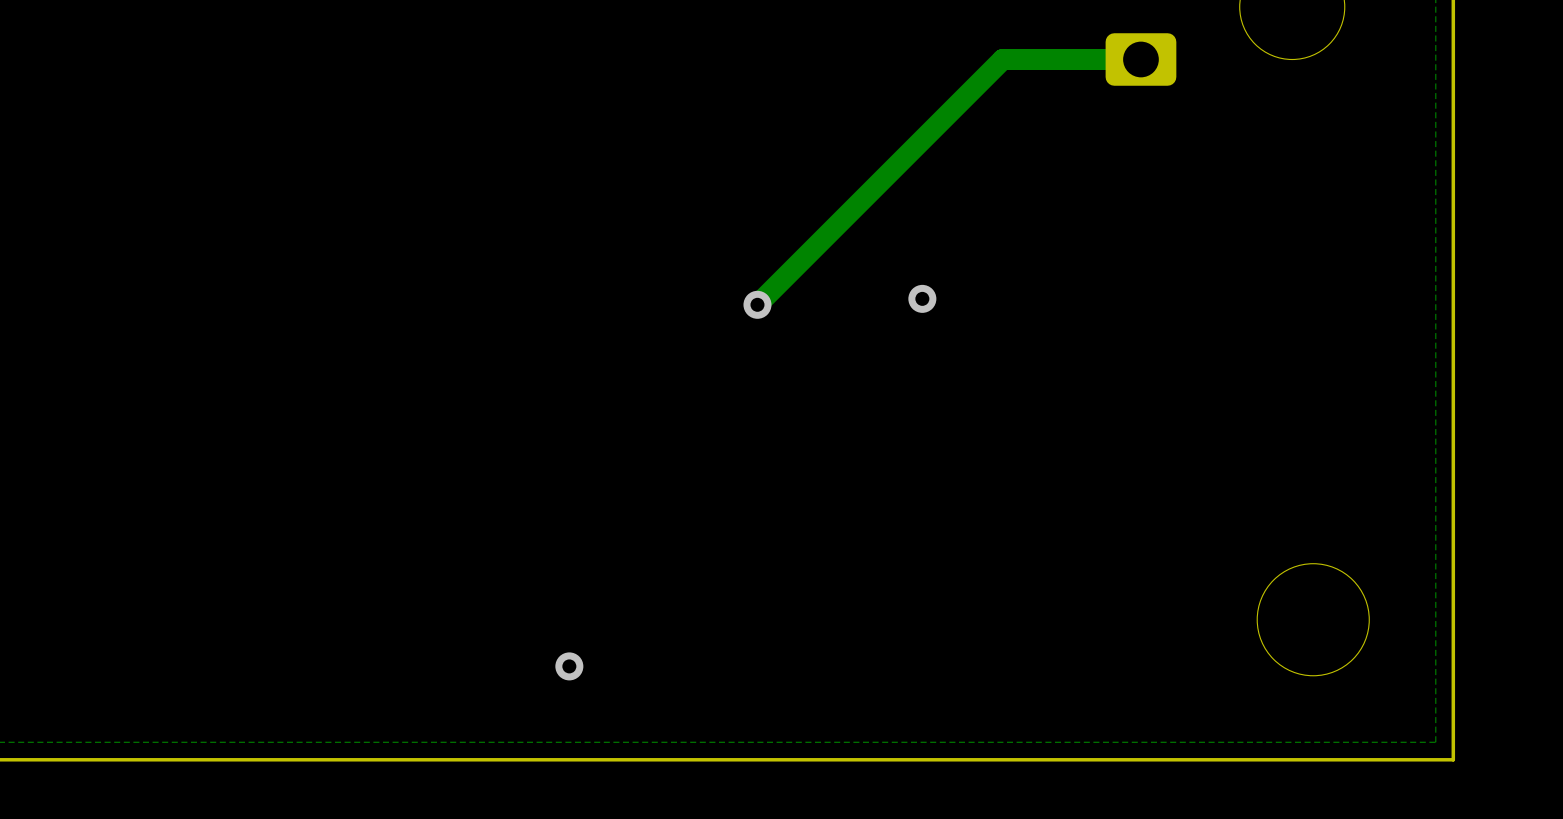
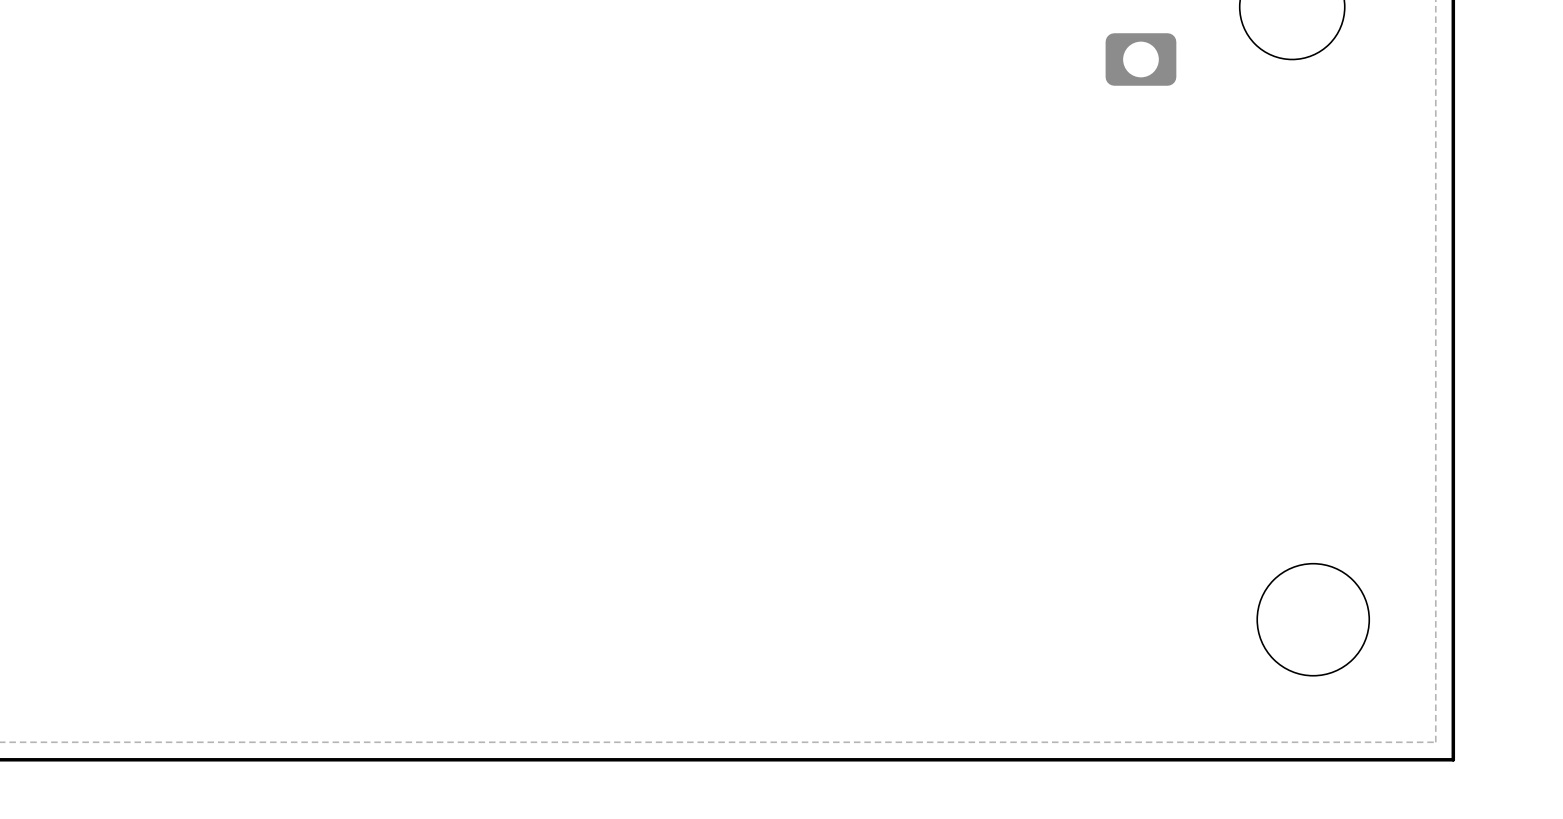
track: (1140, 59) (1002, 59) (757, 304) -> none
via: (922, 298) -> none
via: (757, 304) -> none
via: (569, 666) -> none

